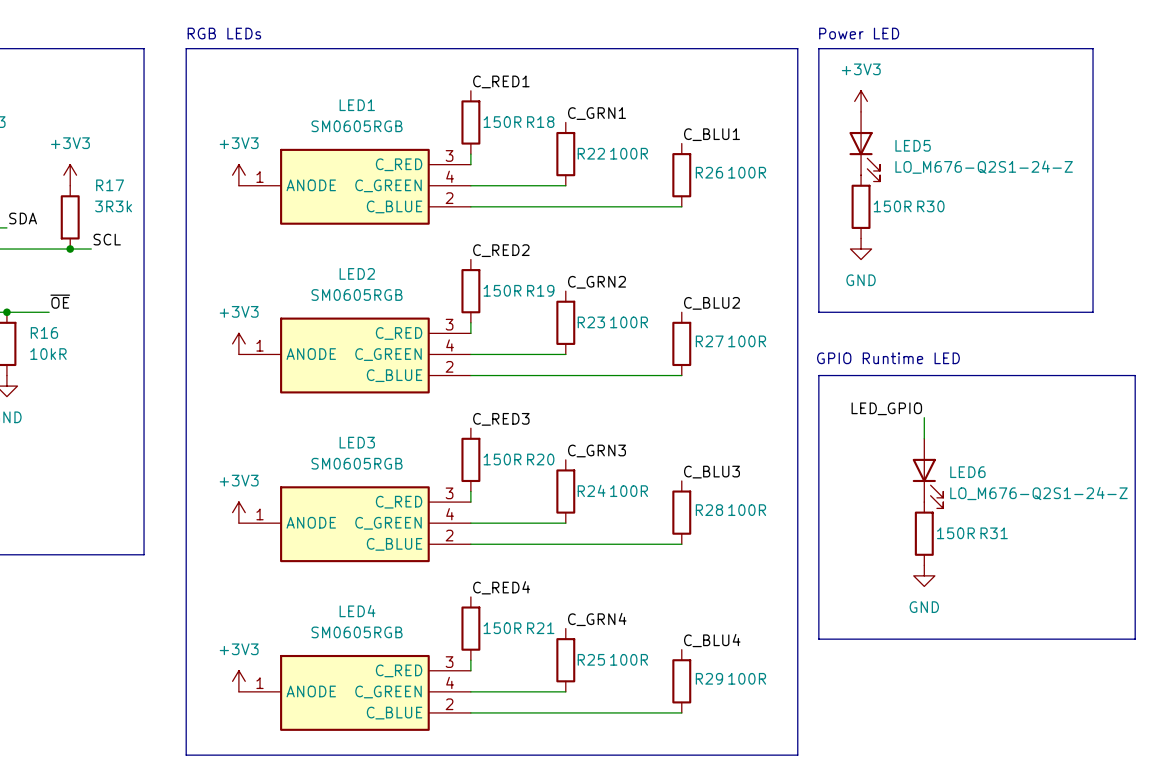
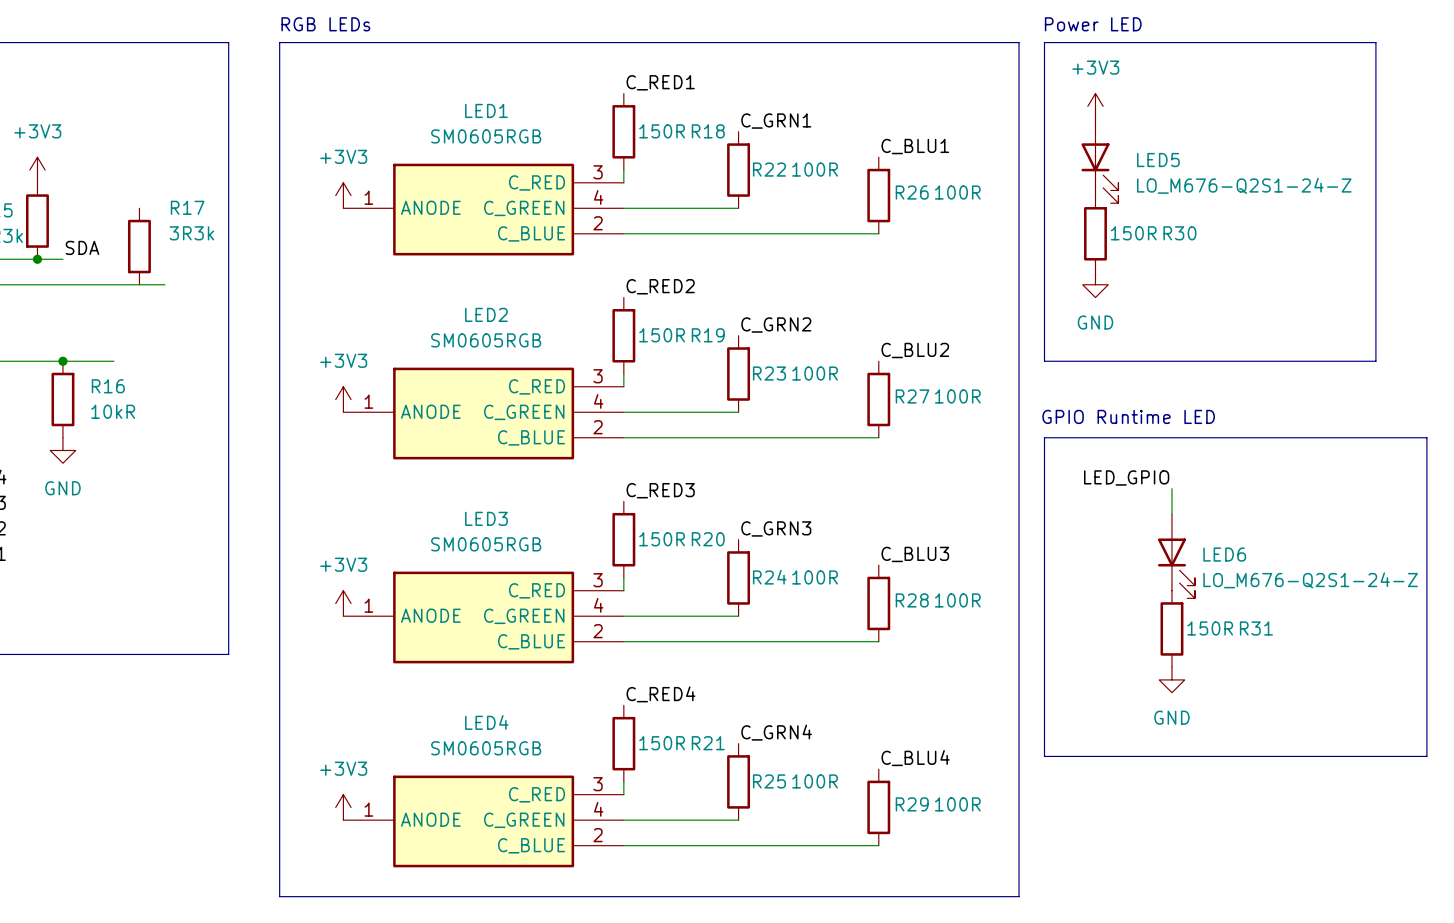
power symbol: +3V3 (70, 175) -> none
label: SCL (107, 239) -> none
junction: (70, 249) -> none
label: ~{OE} (60, 301) -> none

